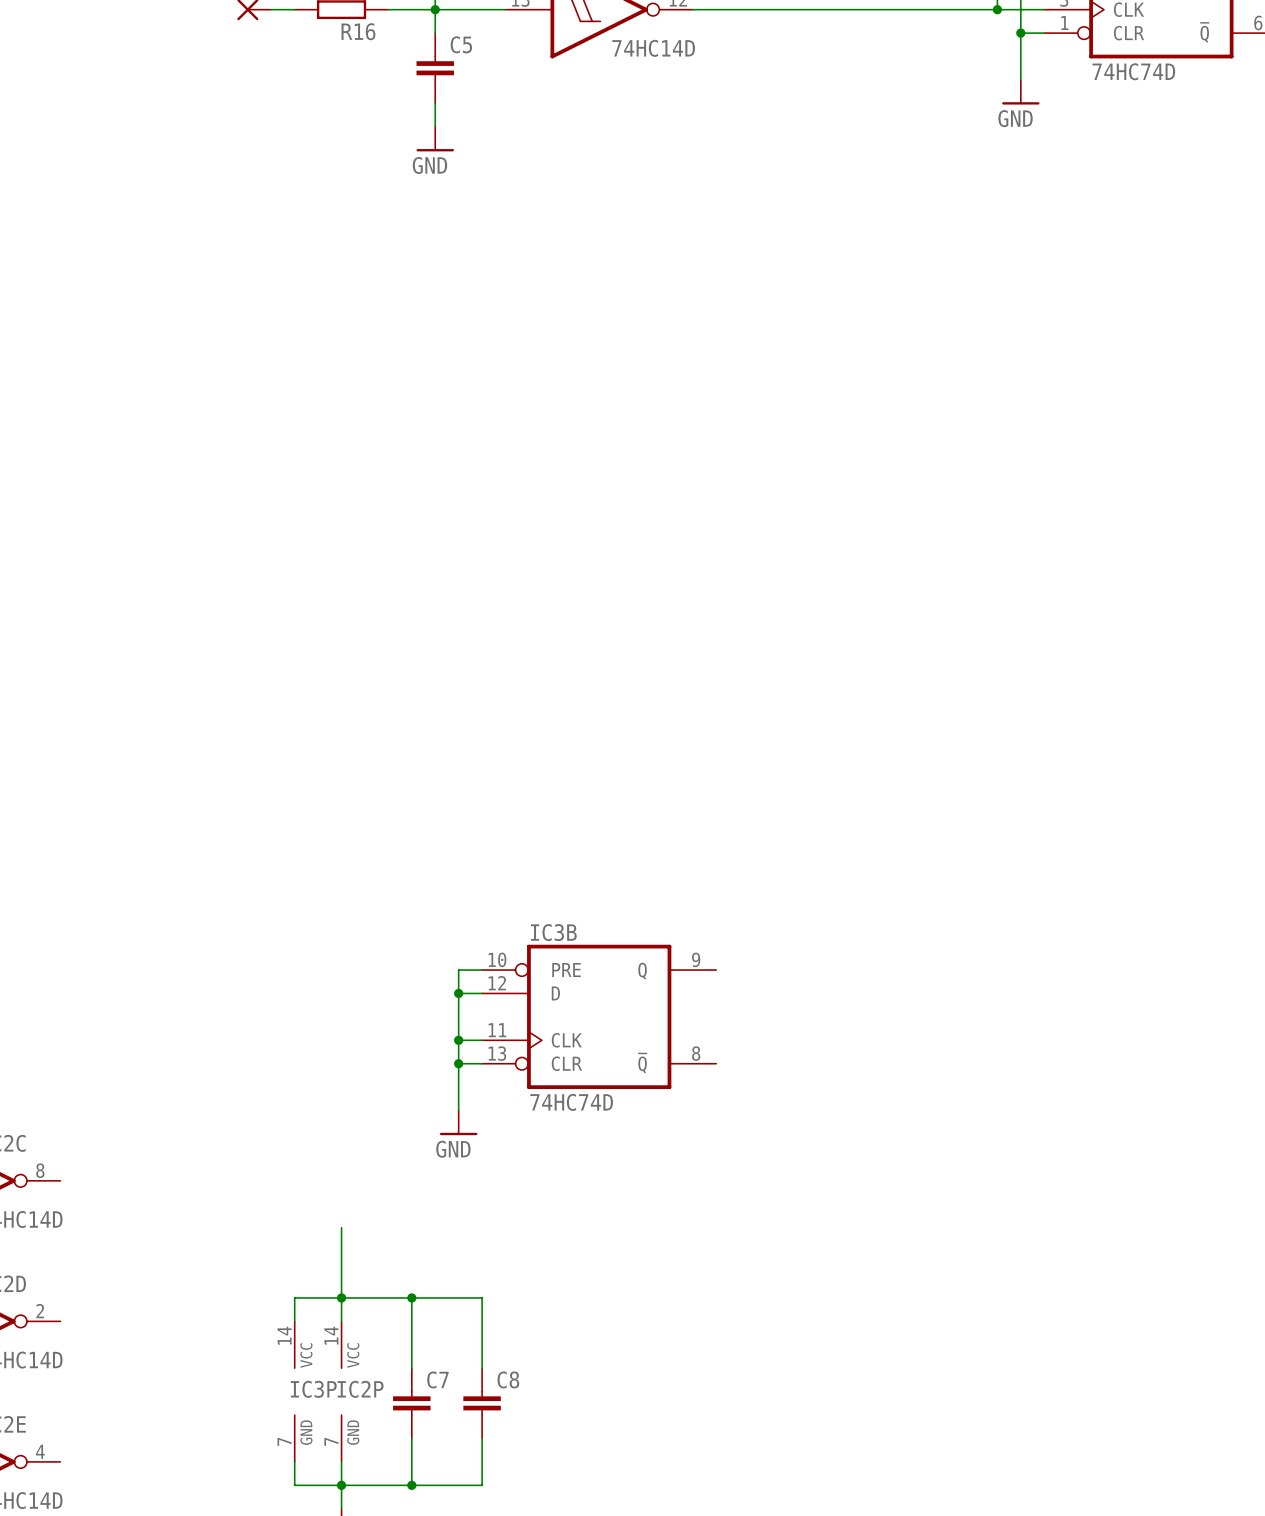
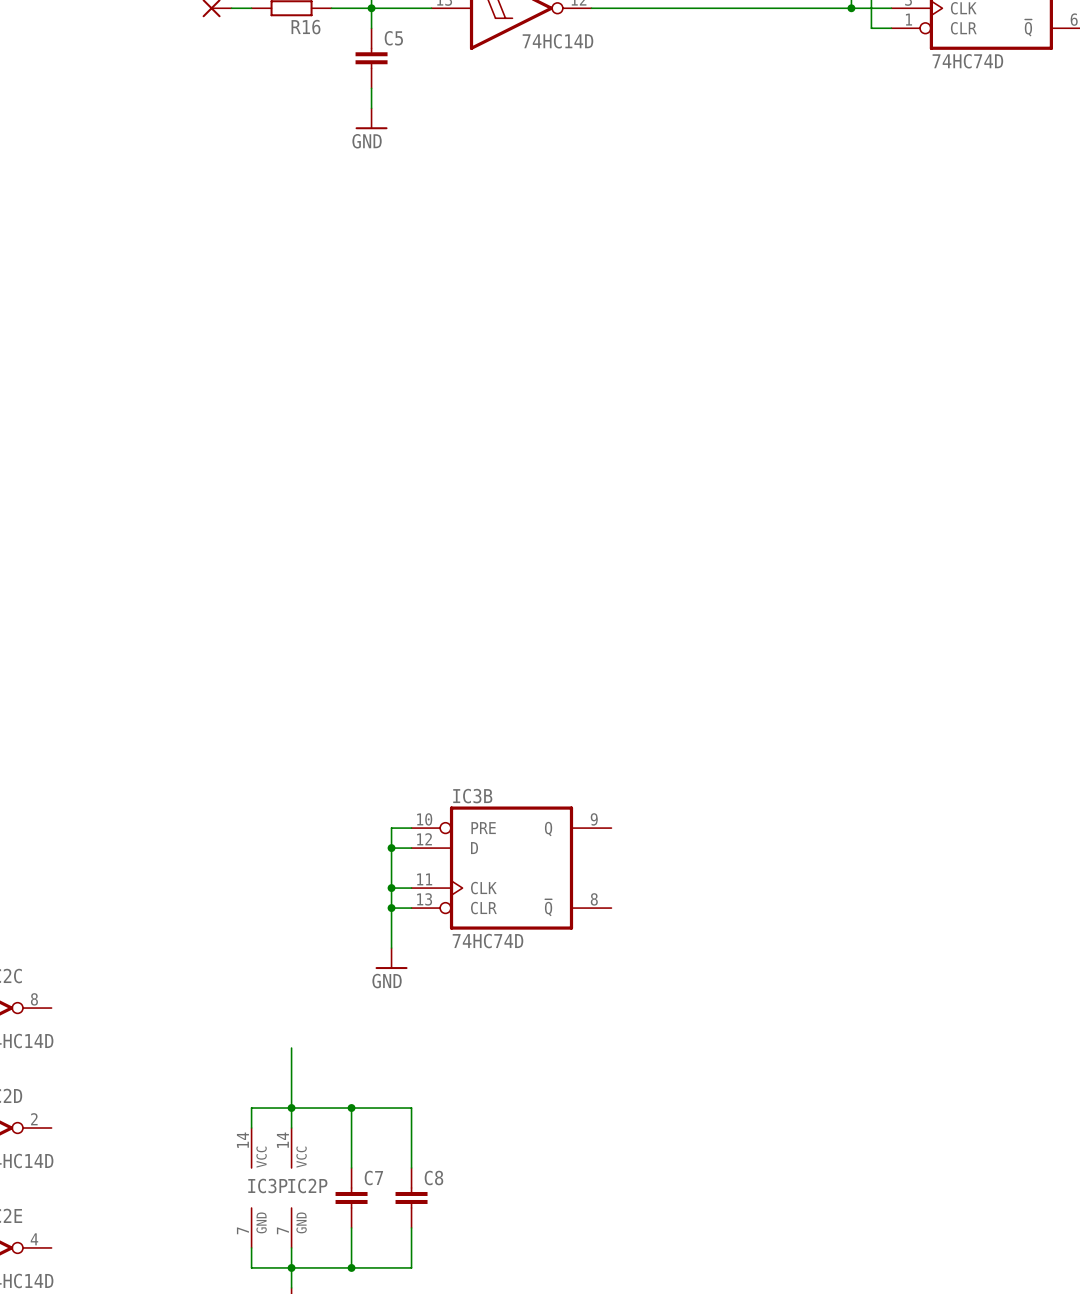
wire: (1020, 33) (1020, 79) -> none
junction: (1020, 33) -> none
power symbol: GND (1020, 92) -> none

